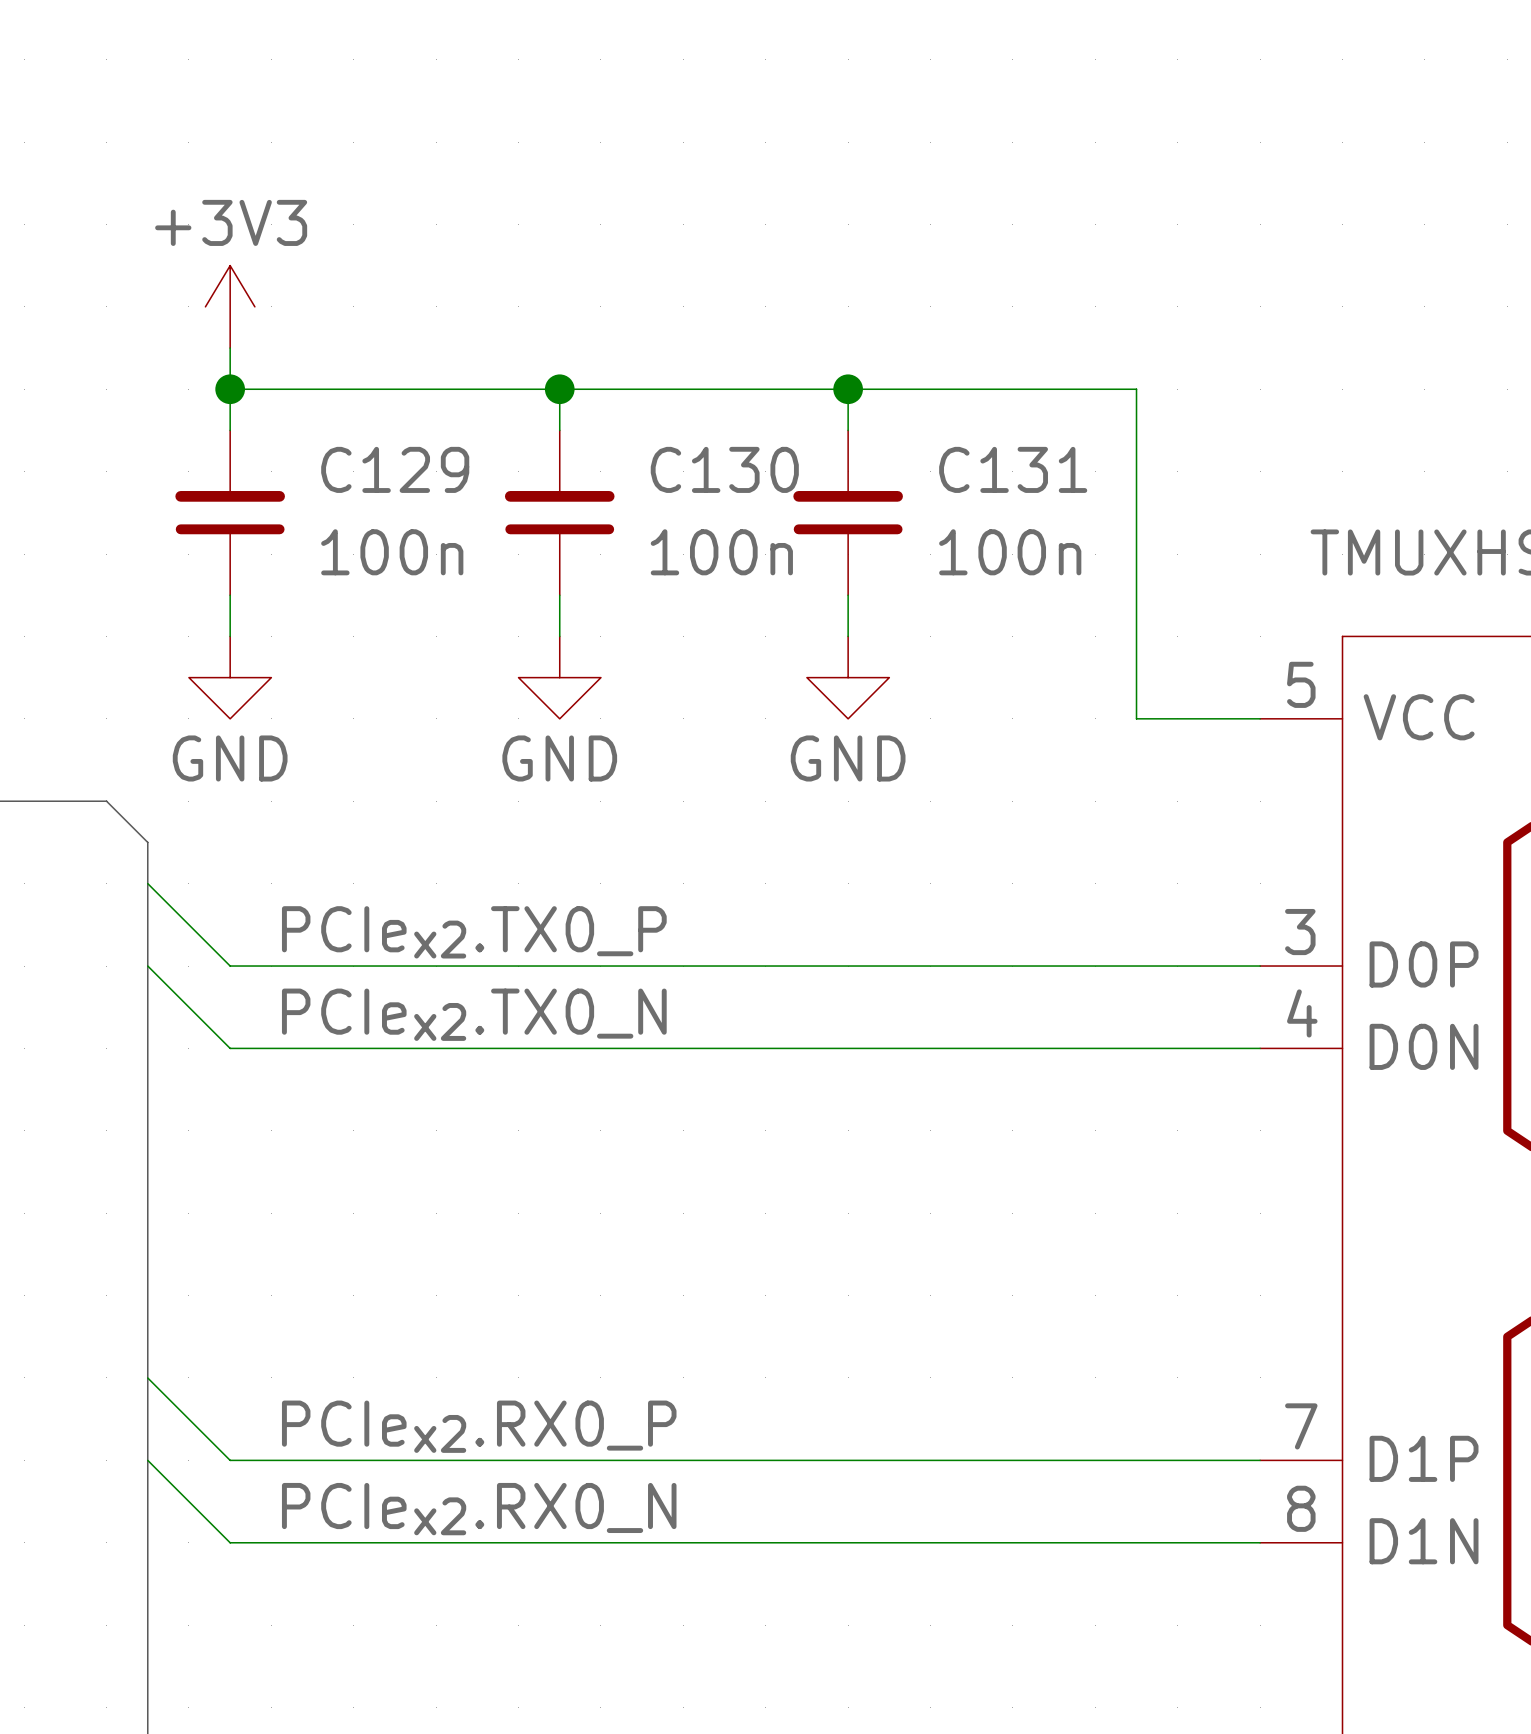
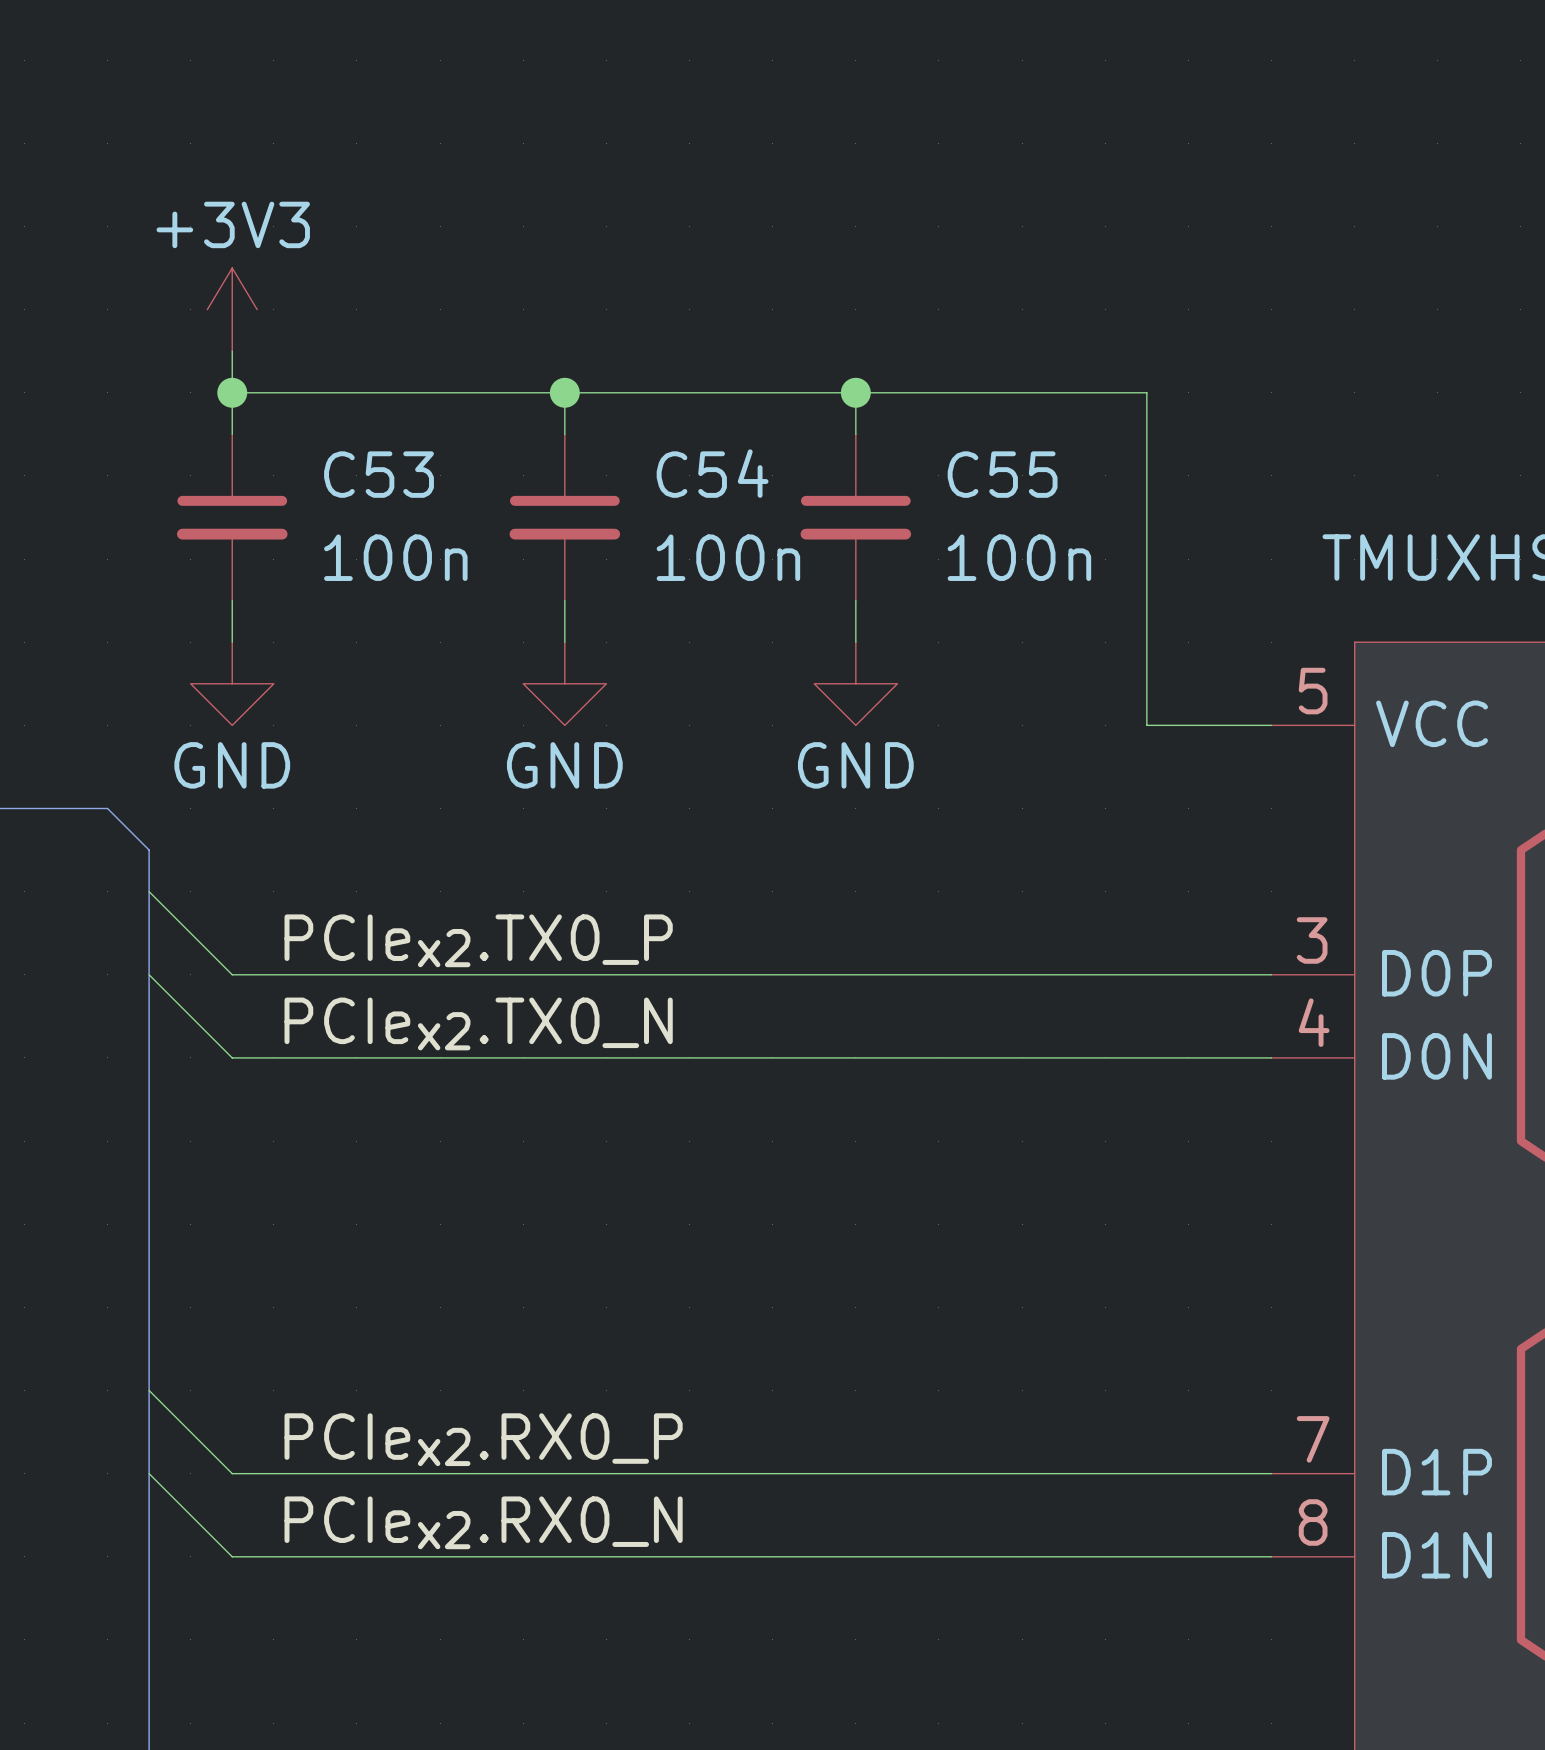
C129: (230, 512) -> none
C53: none -> (232, 517)
C130: (559, 512) -> none
C54: none -> (564, 517)
C131: (848, 512) -> none
C55: none -> (855, 517)

